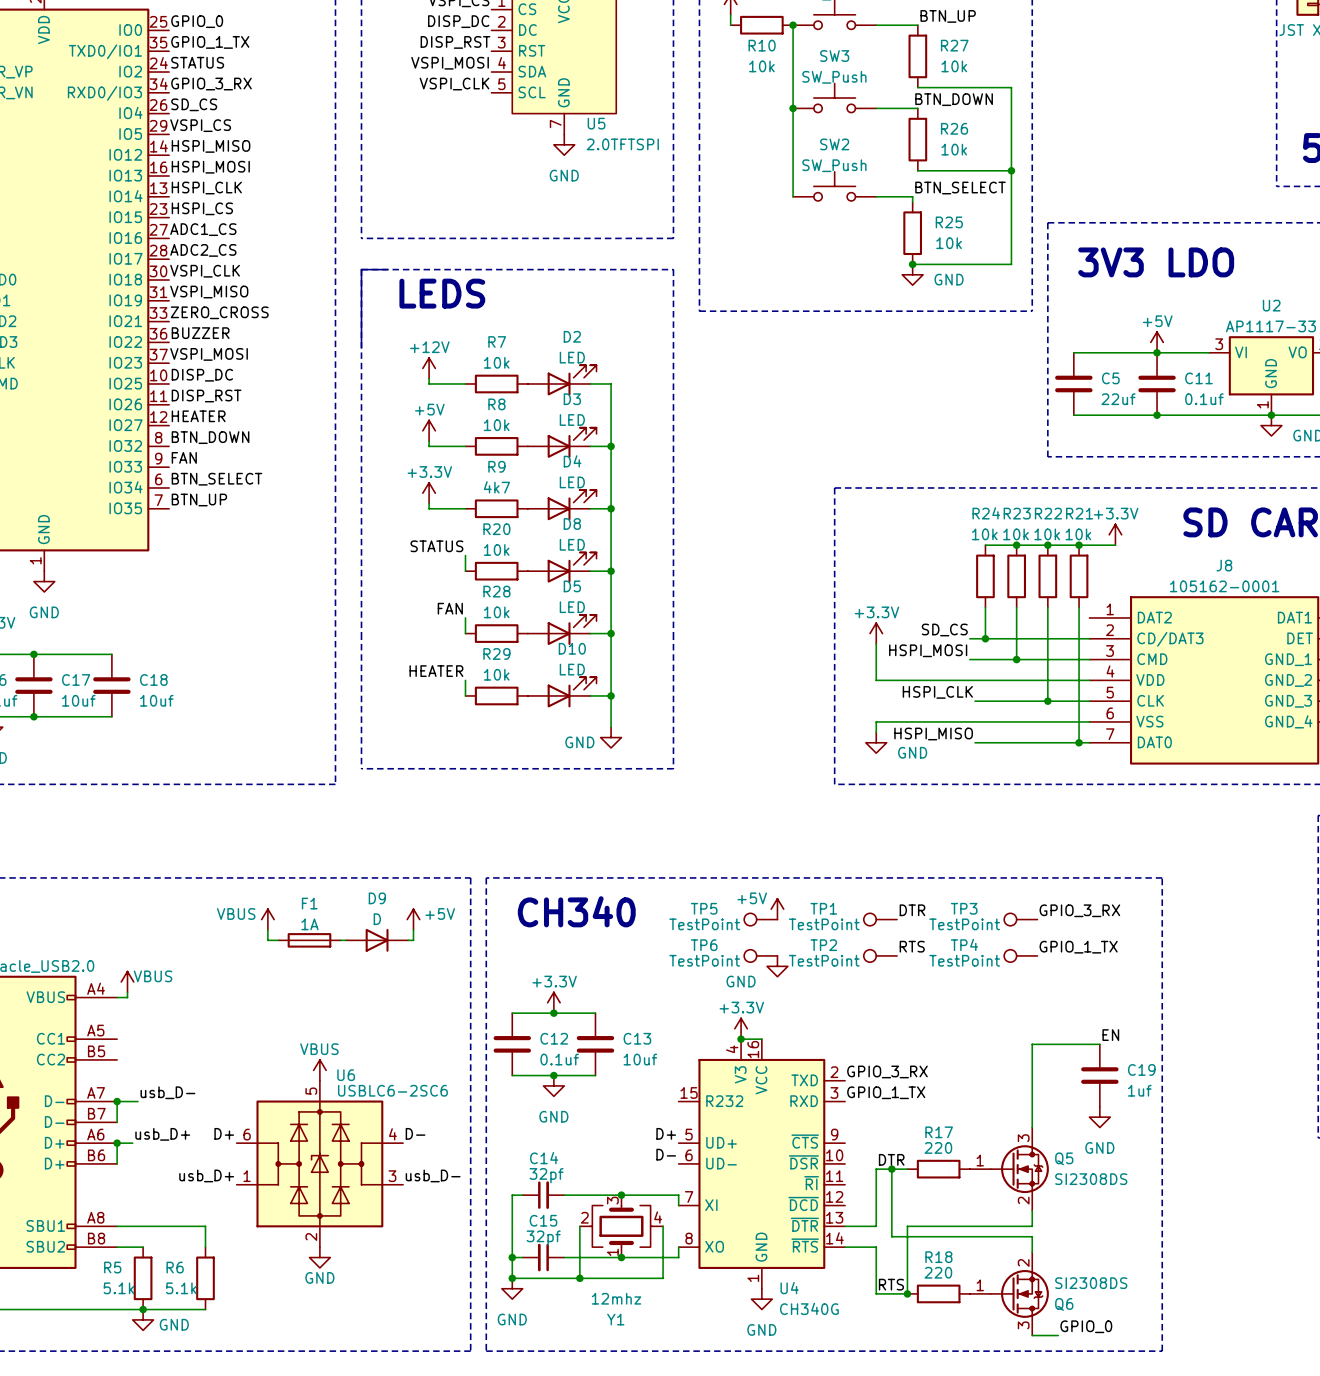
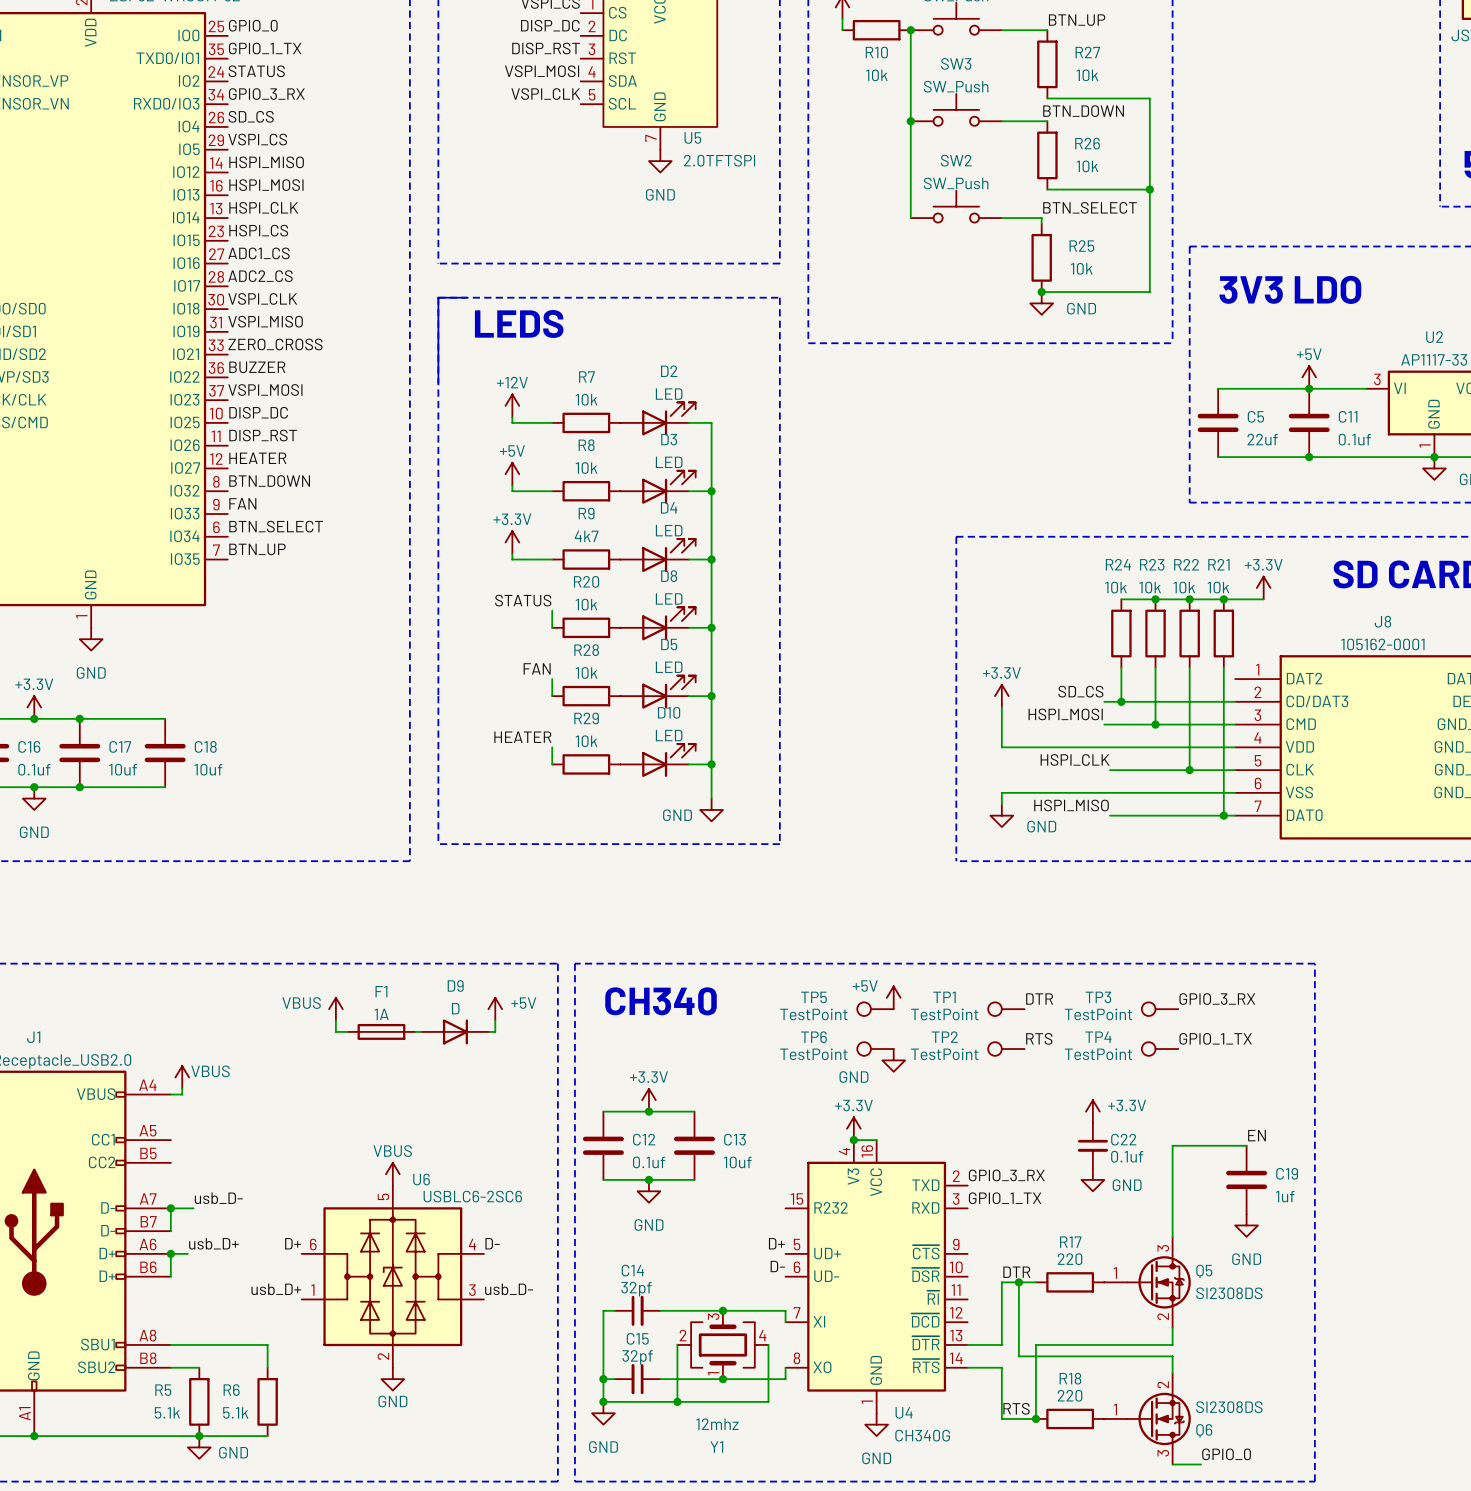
power symbol: none -> +3.3V (1092, 1111)
C22: none -> 0.1uf (1092, 1145)
power symbol: none -> GND (1092, 1179)

